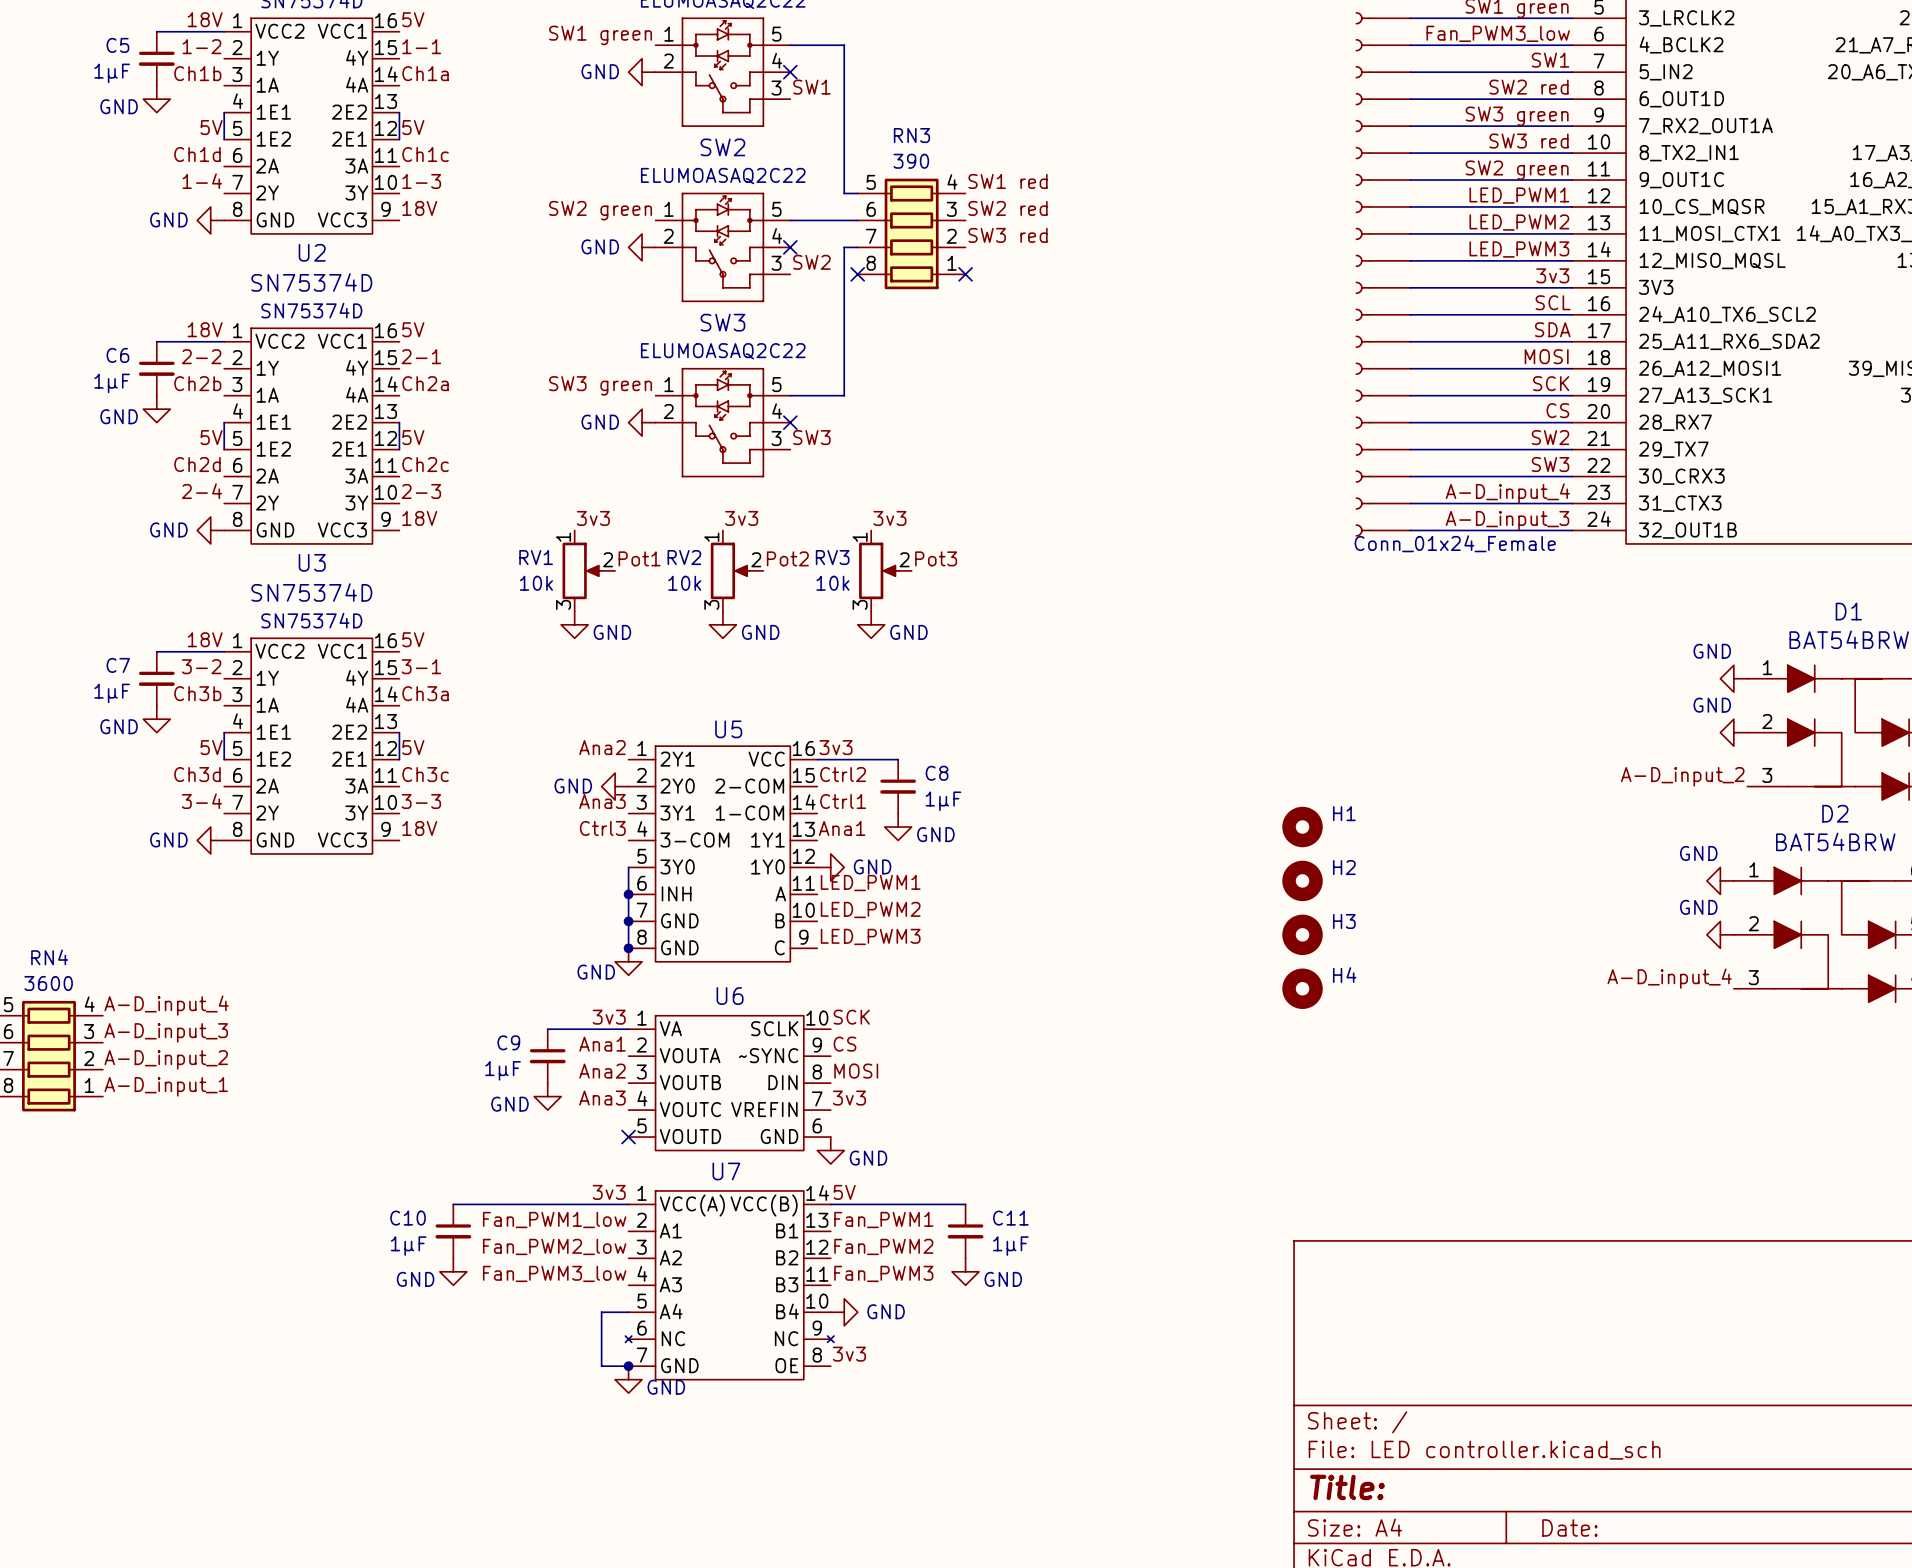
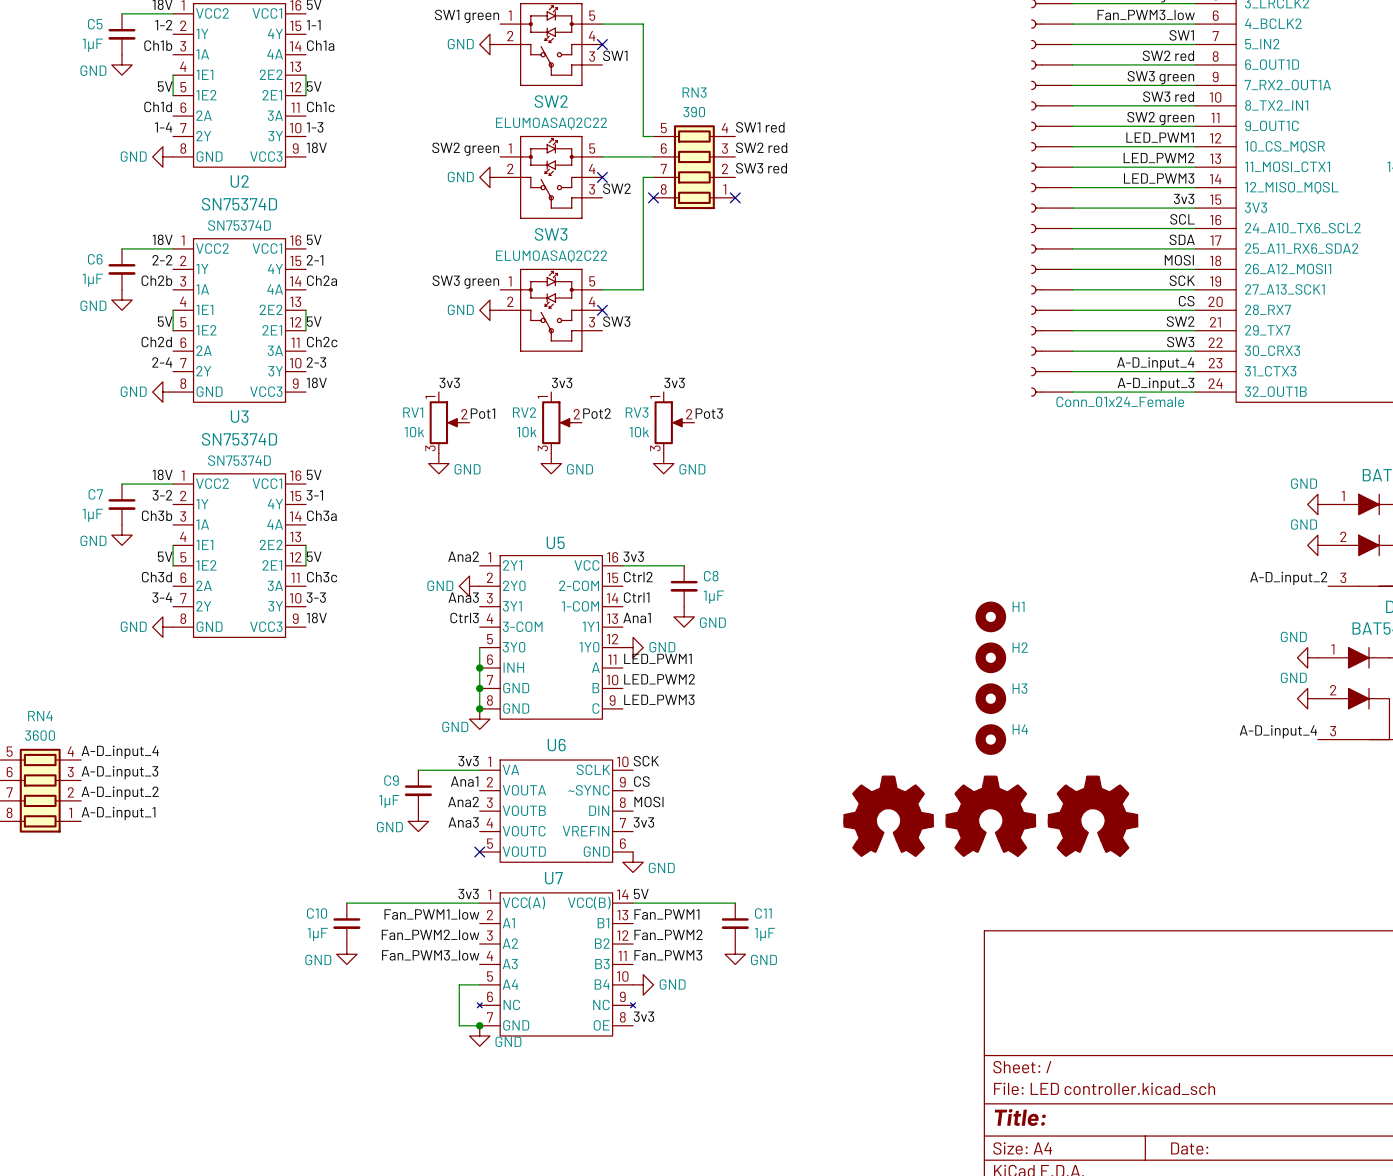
part: none -> (888, 816)
part: none -> (990, 816)
part: none -> (1093, 816)

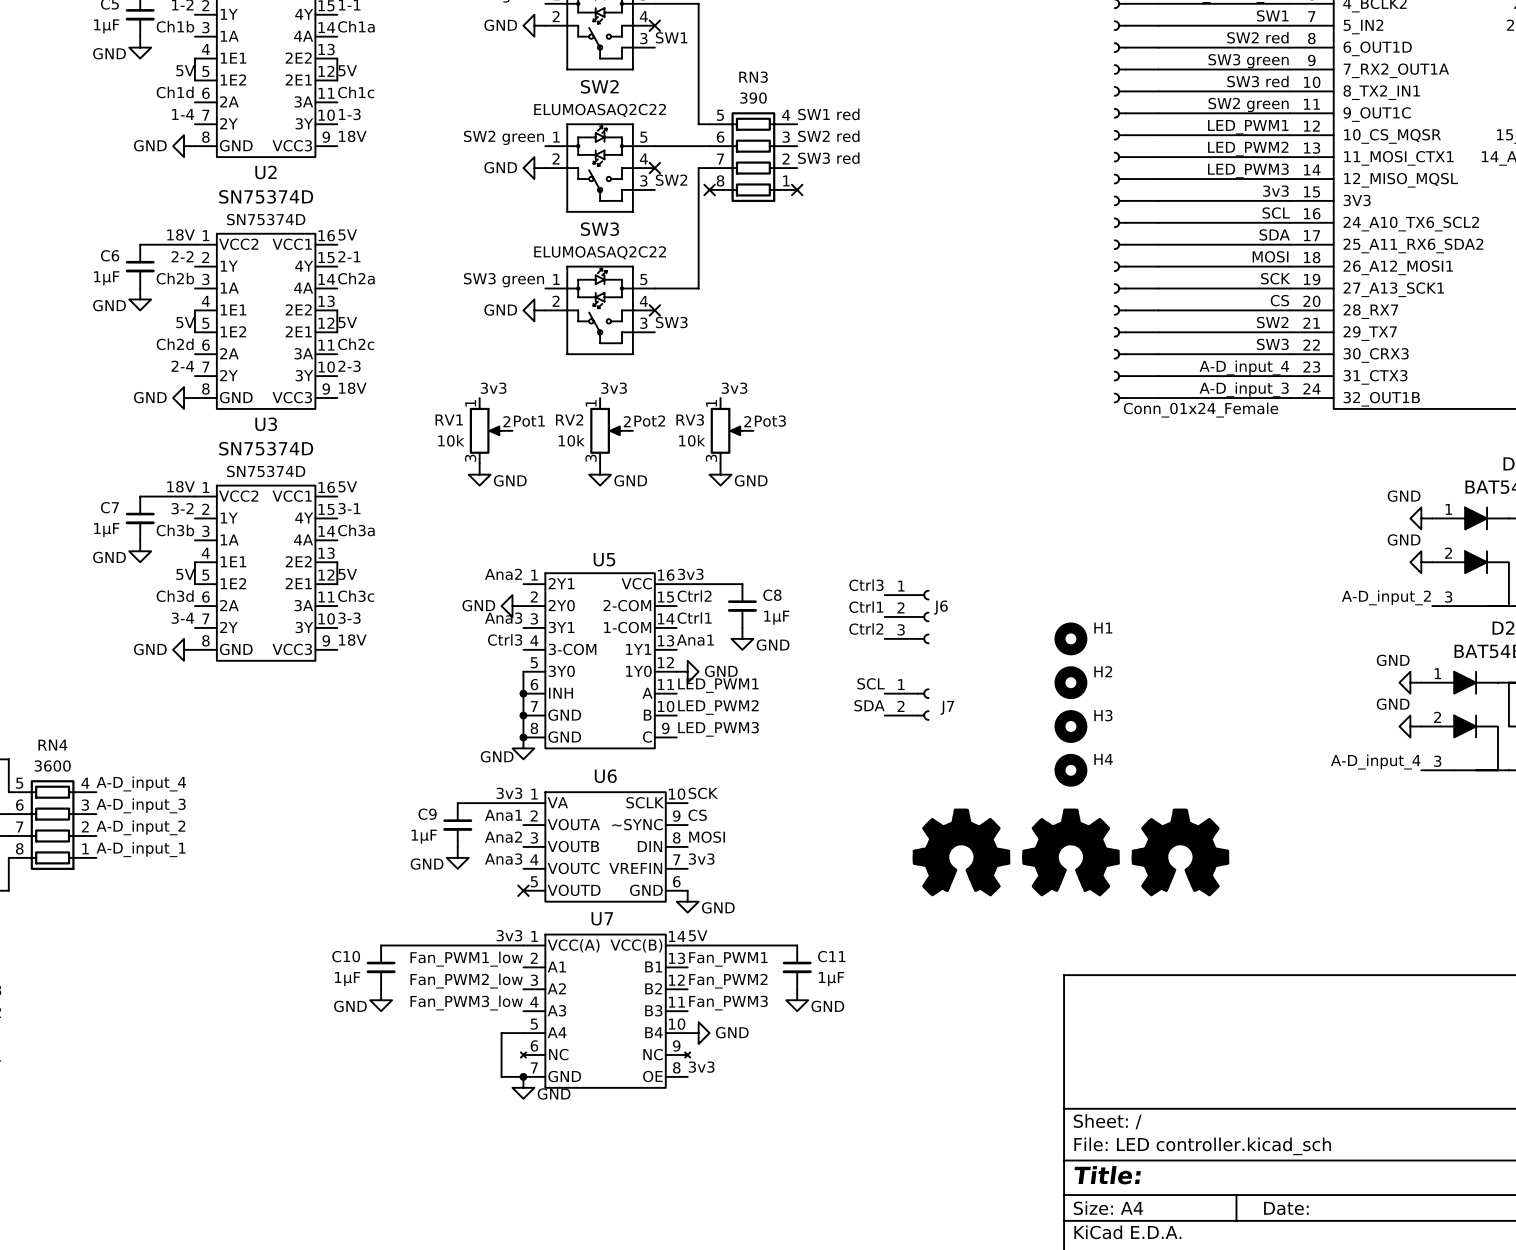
label: none -> Ctrl3 (866, 585)
label: none -> Ctrl1 (866, 607)
J6: none -> (907, 617)
label: none -> Ctrl2 (866, 629)
label: none -> SCL (871, 683)
J7: none -> (907, 704)
label: none -> SDA (869, 705)

